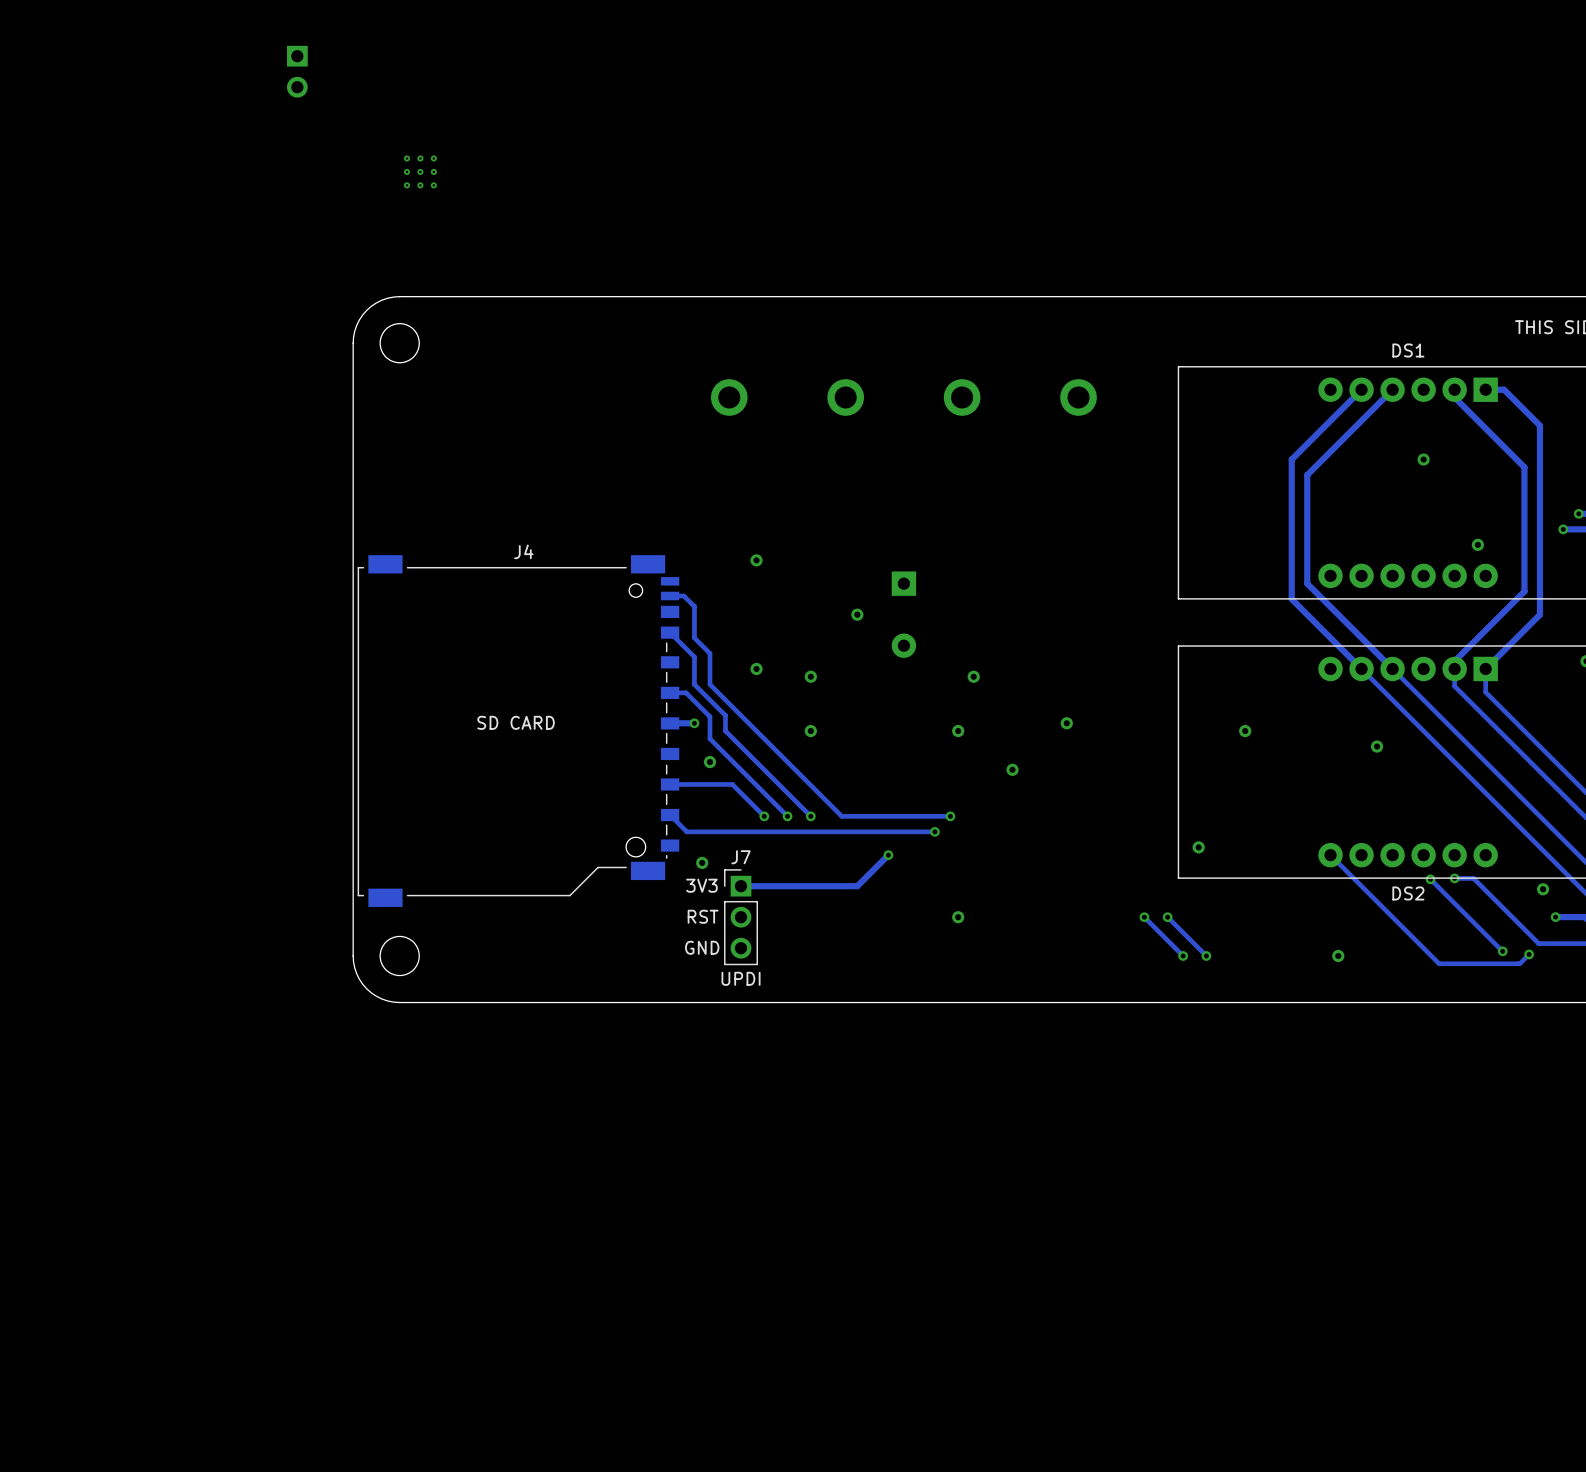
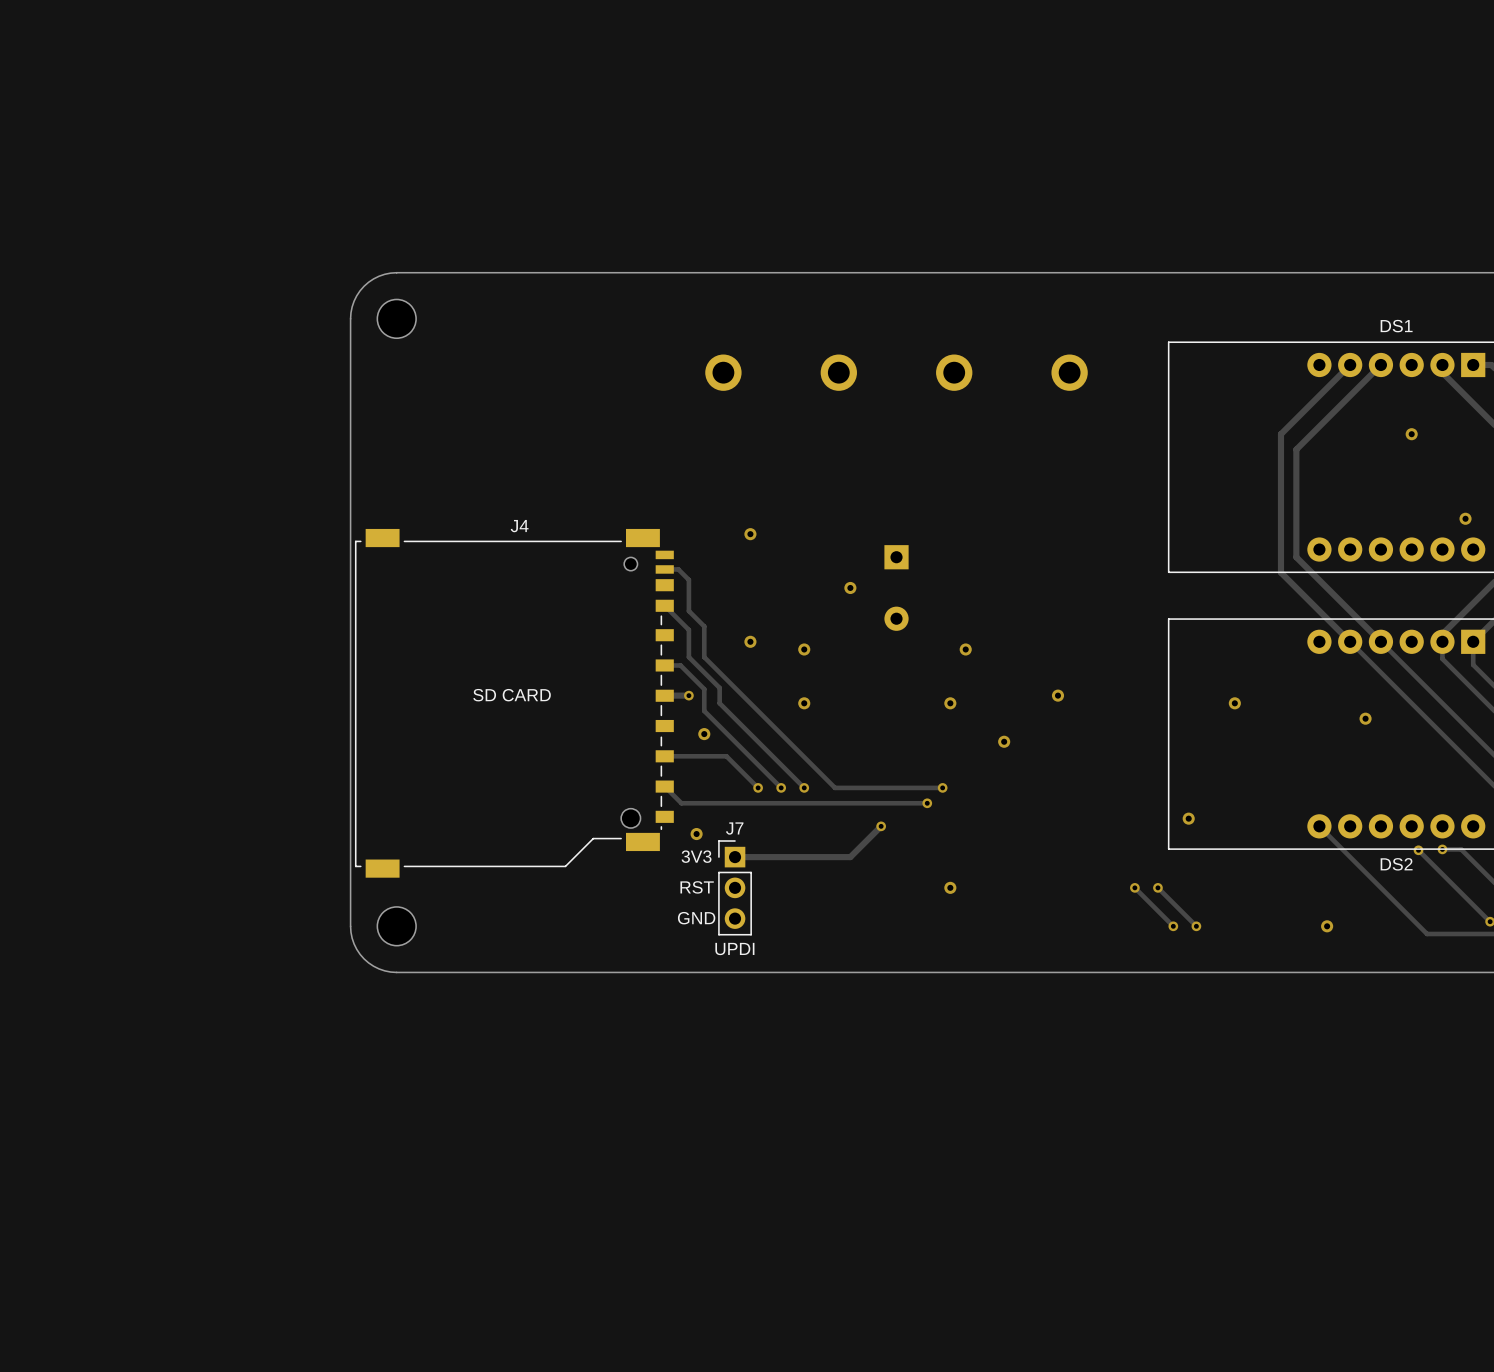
part: (297, 71) -> none
part: (420, 171) -> none

